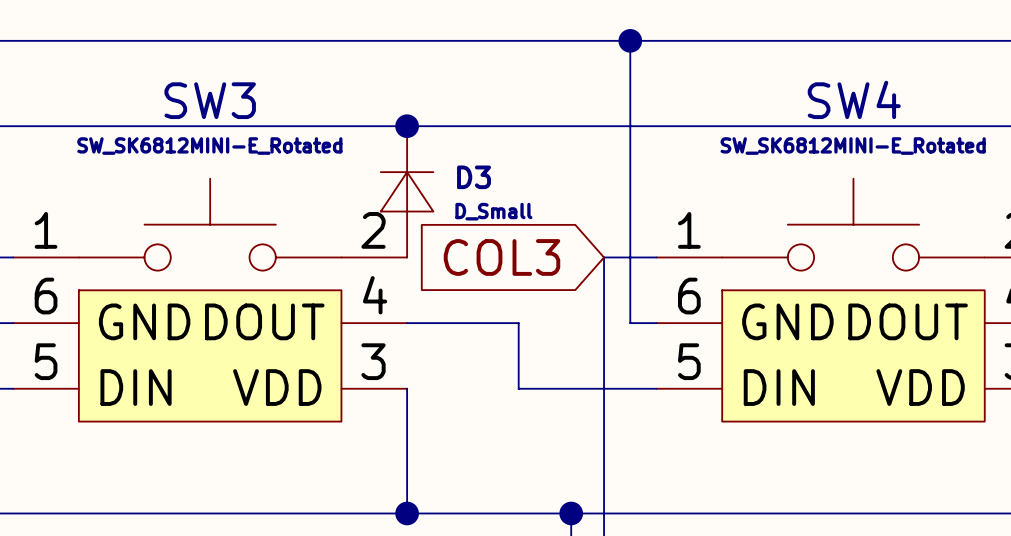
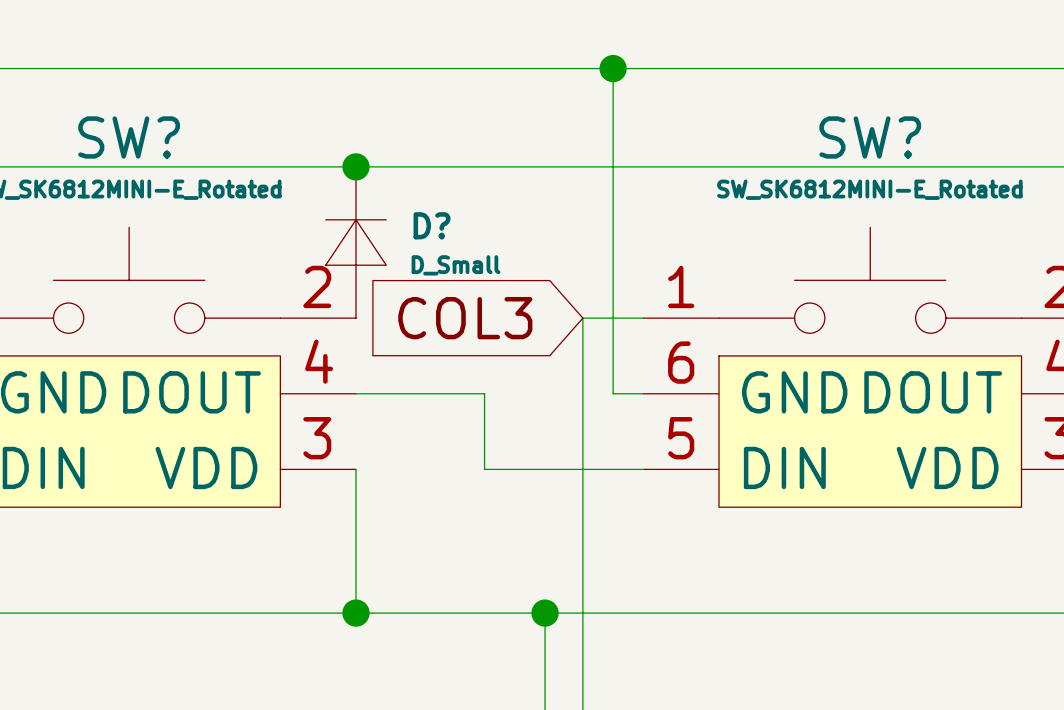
SW4 name: SW4 (854, 99) -> SW? (870, 137)
SW3 name: SW3 (210, 100) -> SW? (129, 137)
D3 name: D3 (474, 177) -> D? (432, 225)

